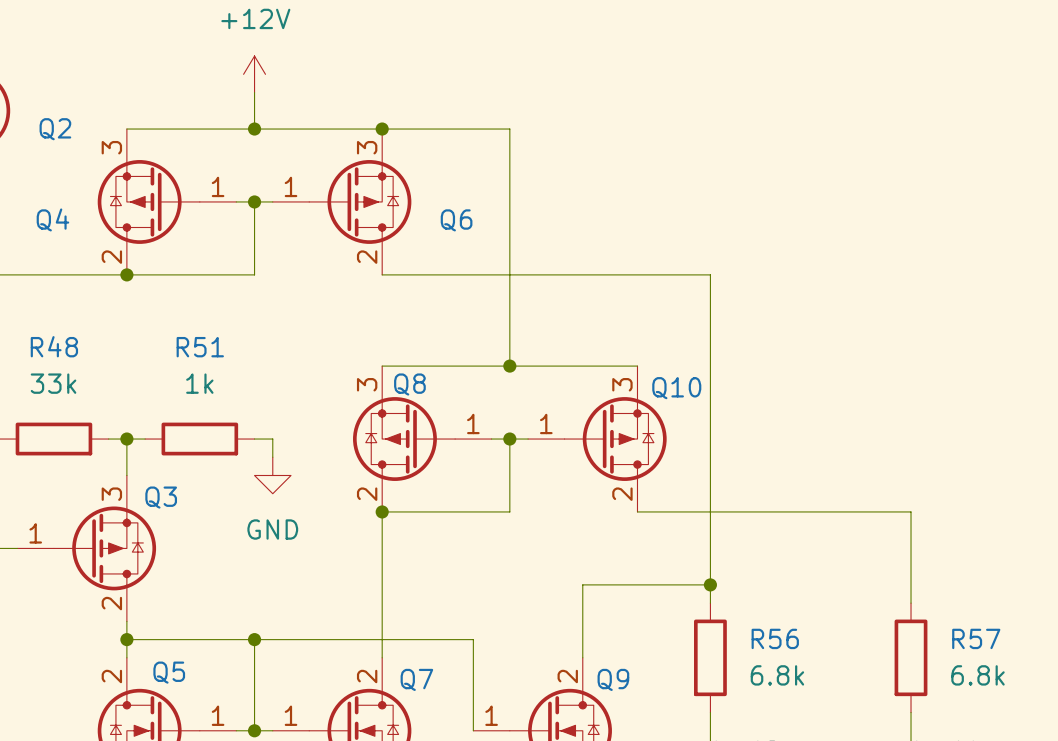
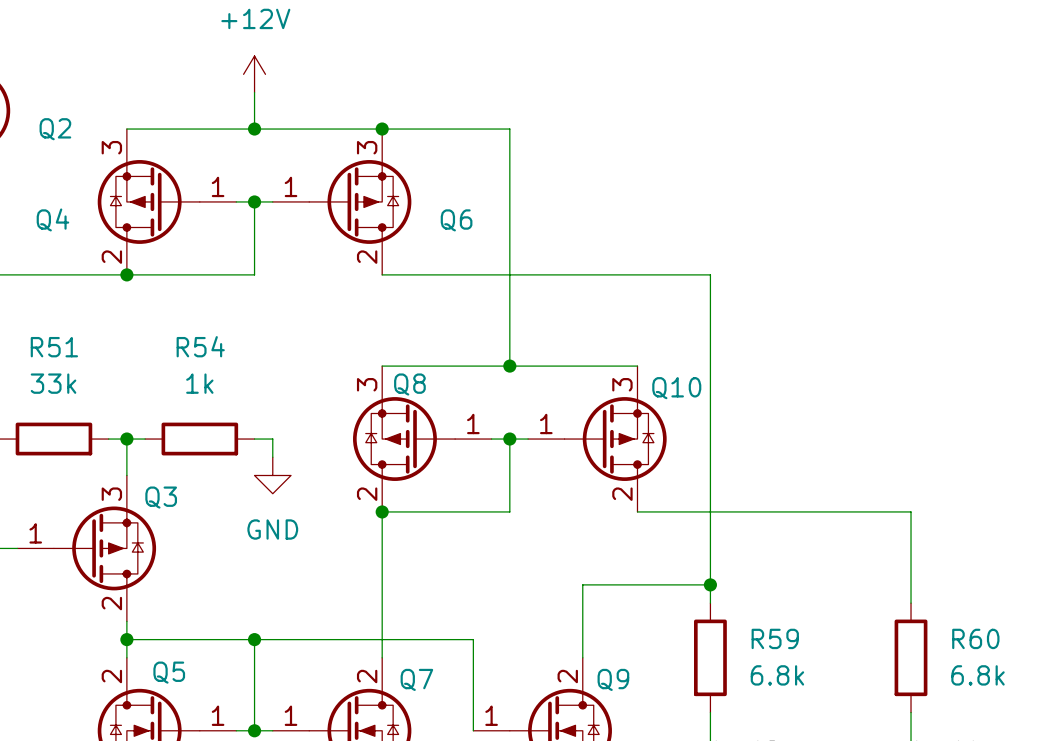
R48 name: R48 (54, 346) -> R51 (54, 347)
R51 name: R51 (200, 347) -> R54 (200, 346)
R56 name: R56 (775, 638) -> R59 (775, 638)
R57 name: R57 (976, 638) -> R60 (975, 638)

